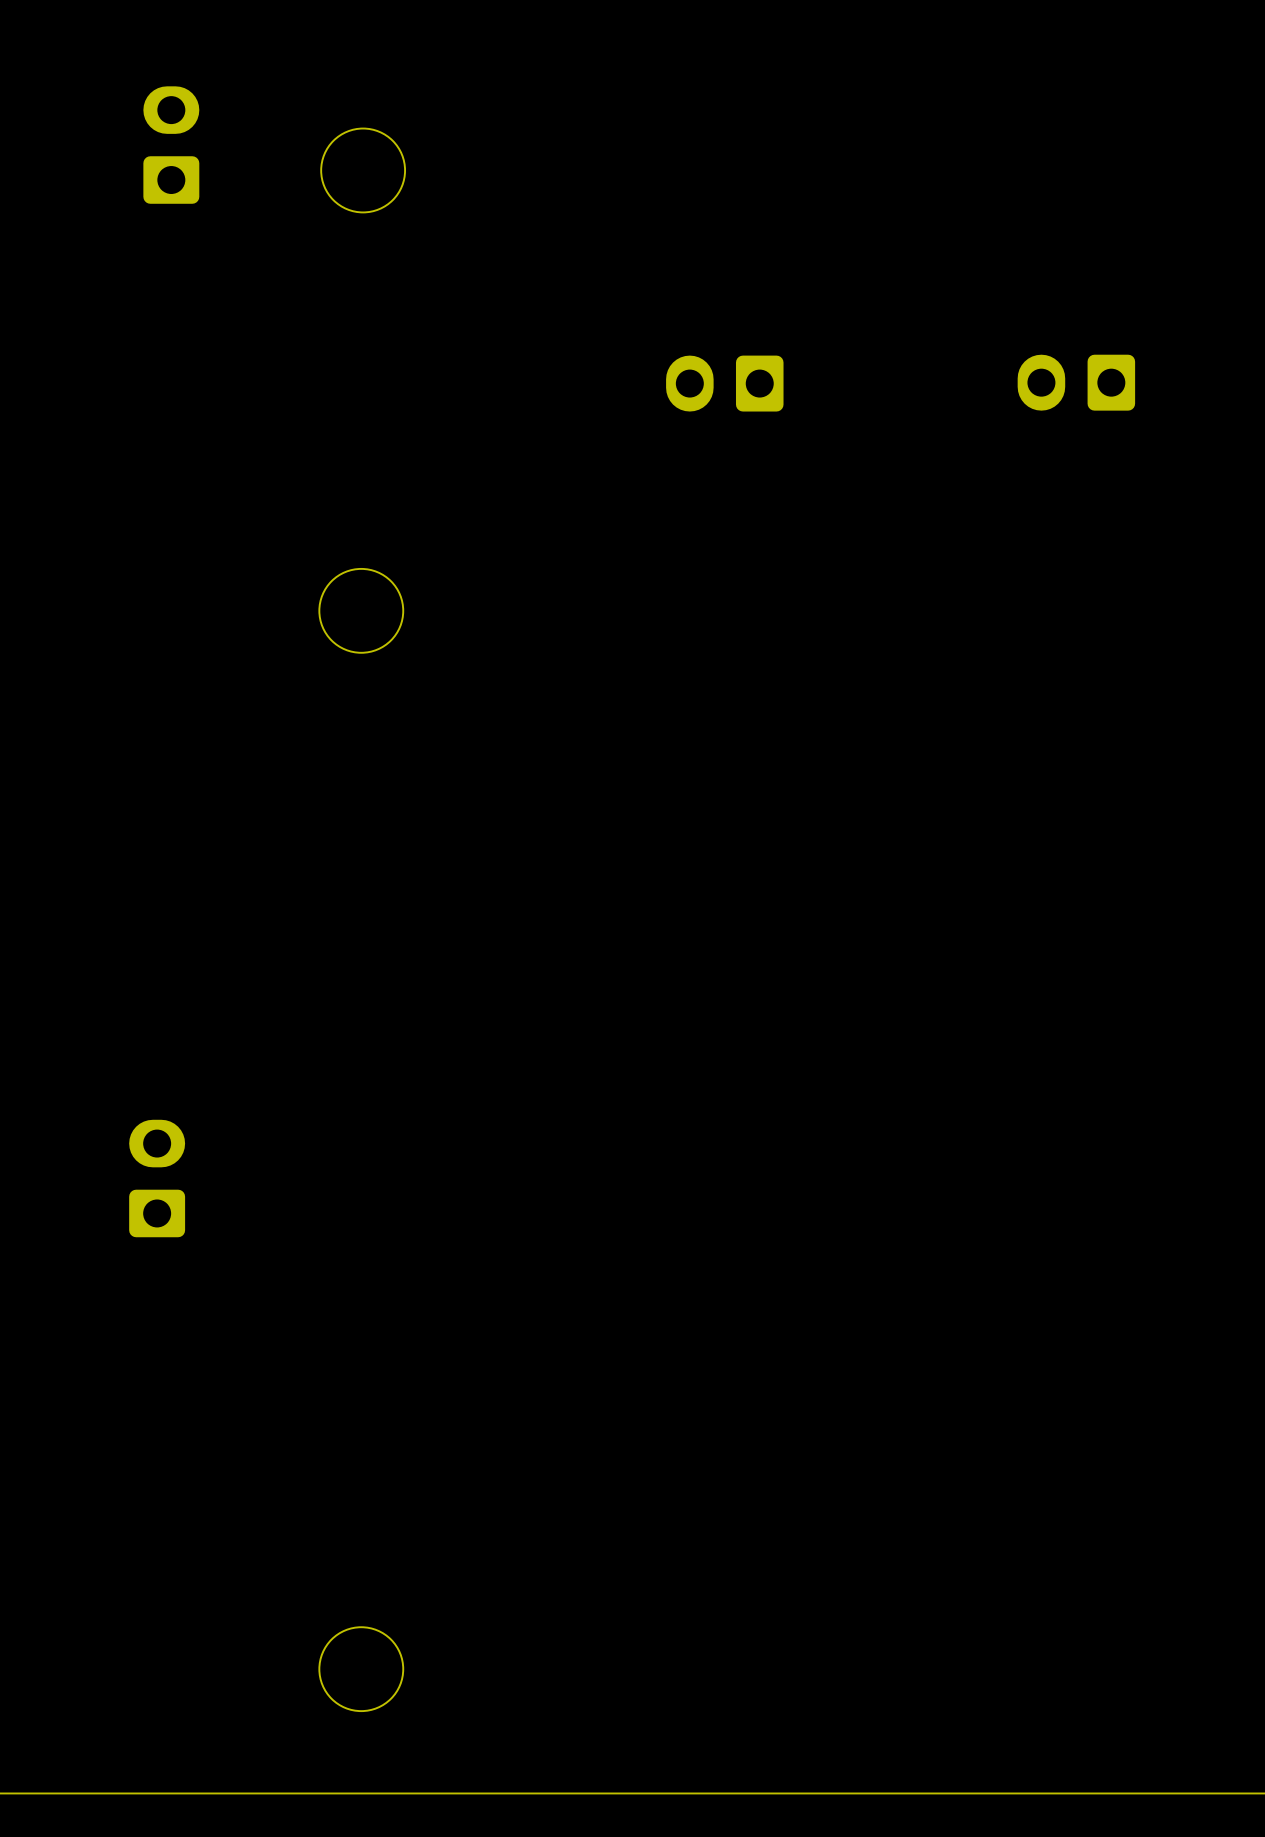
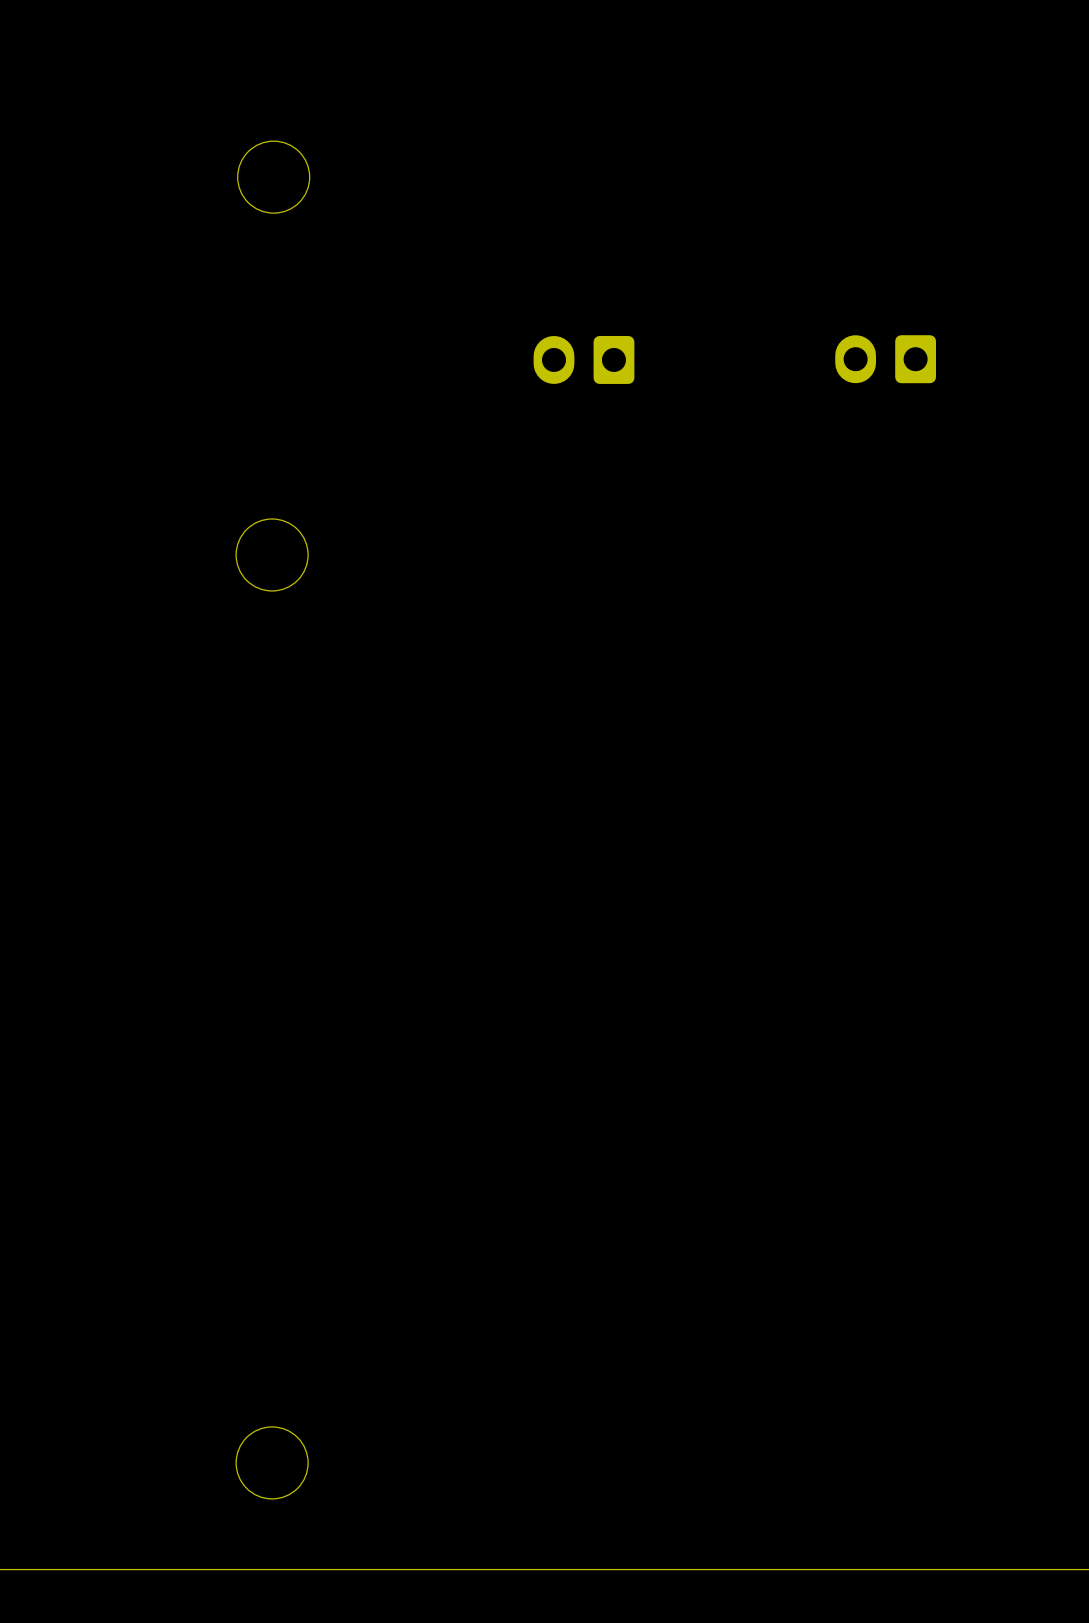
part: (171, 145) -> none
part: (157, 1178) -> none

